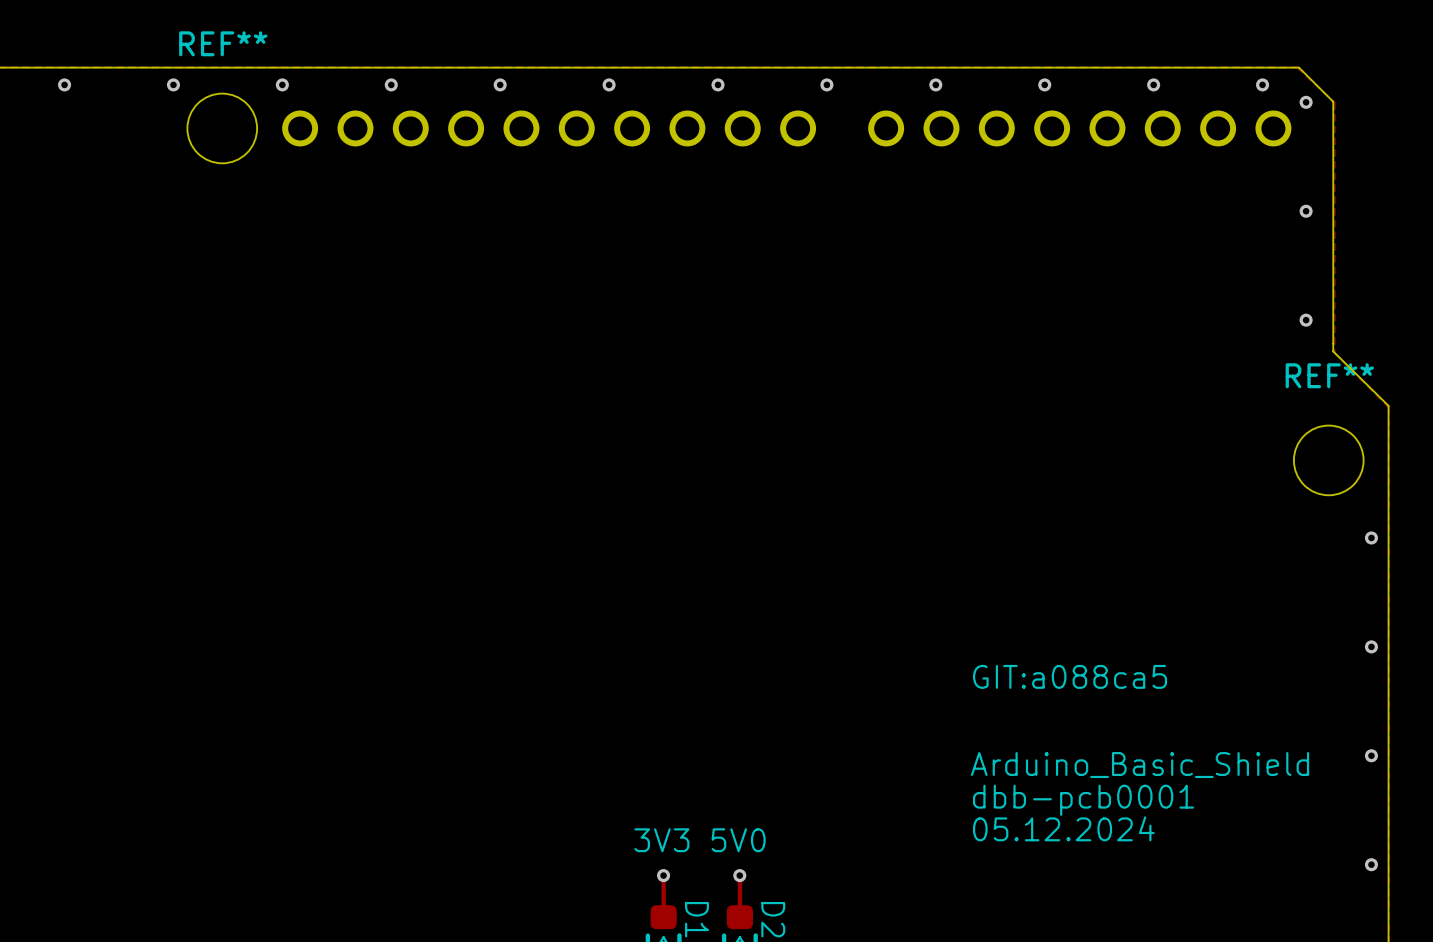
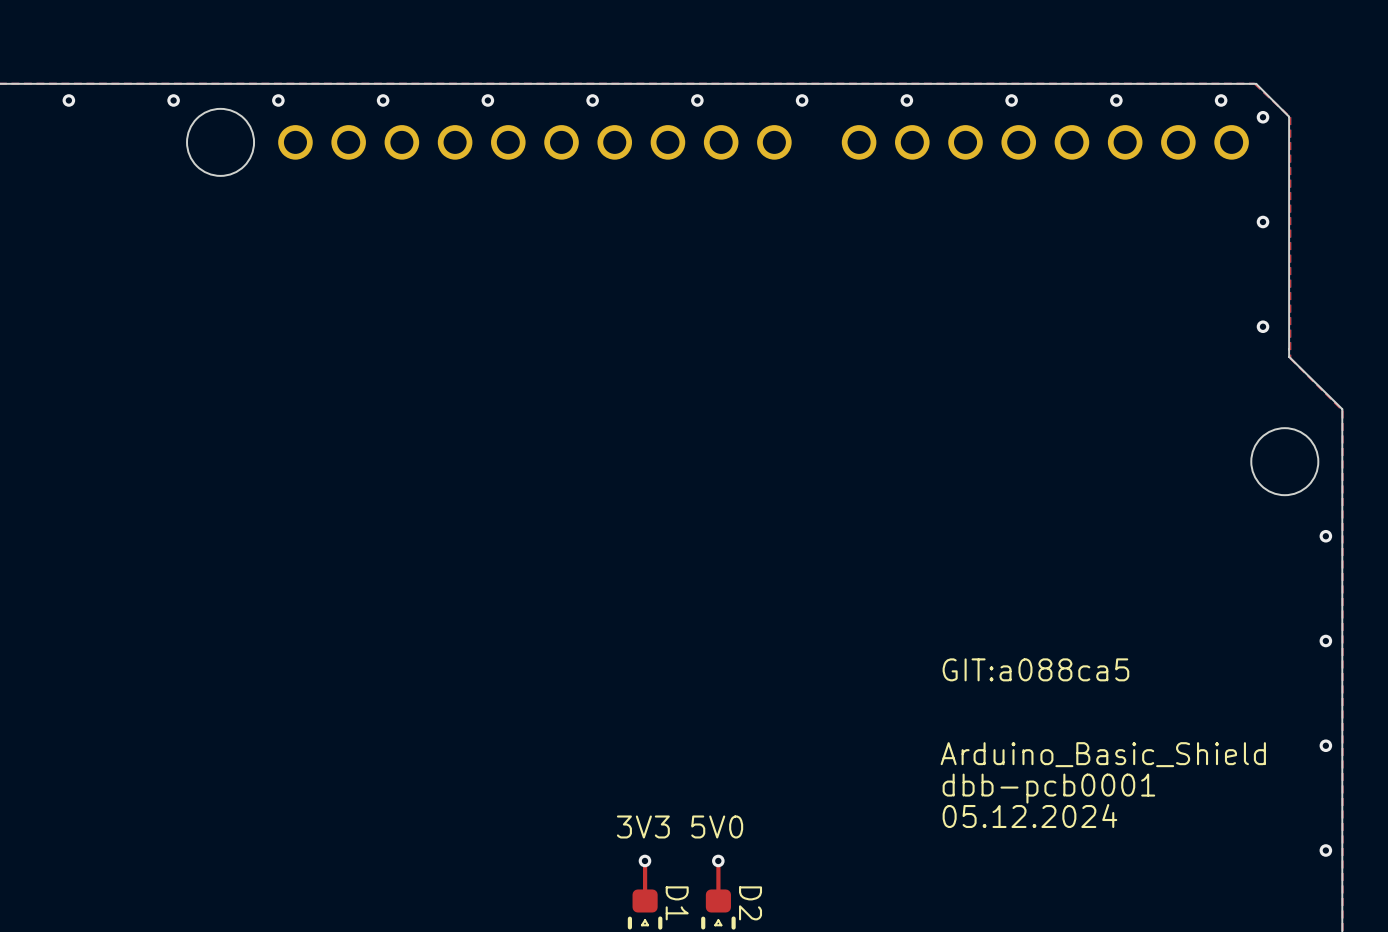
REF** name: REF** (223, 43) -> none
REF** name: REF** (1329, 375) -> none

